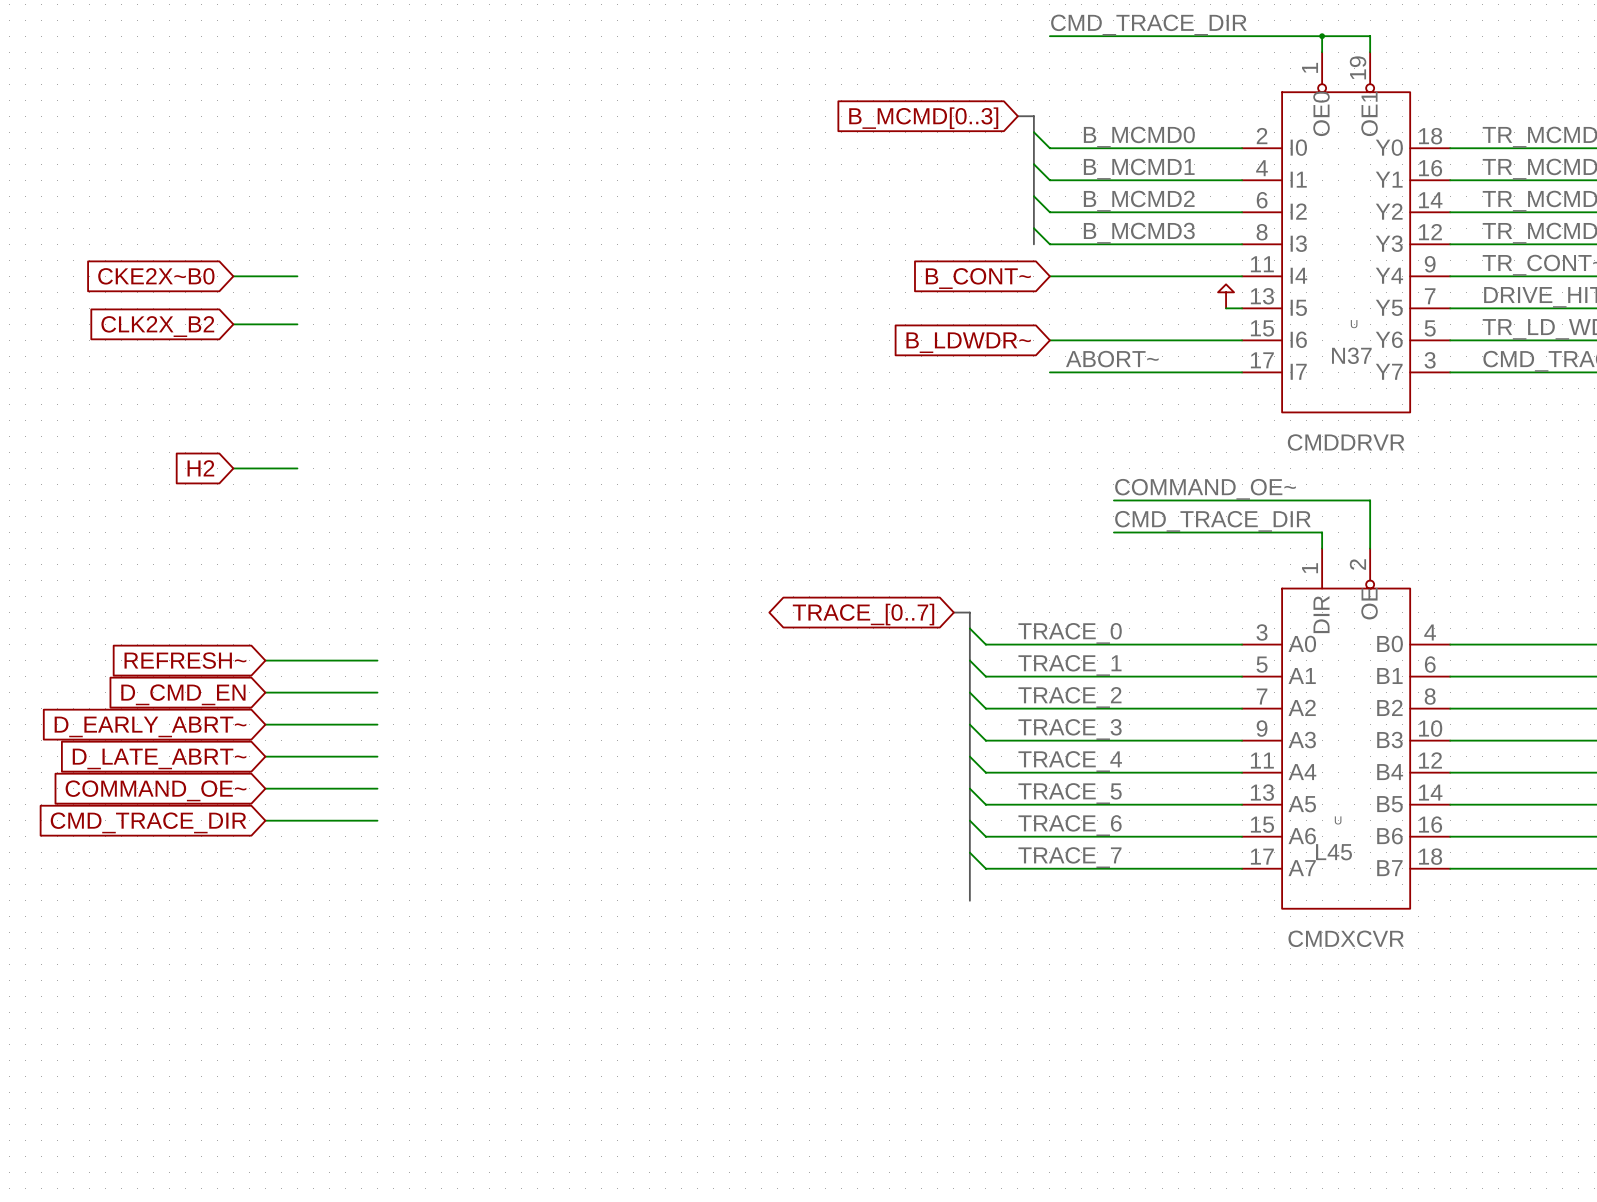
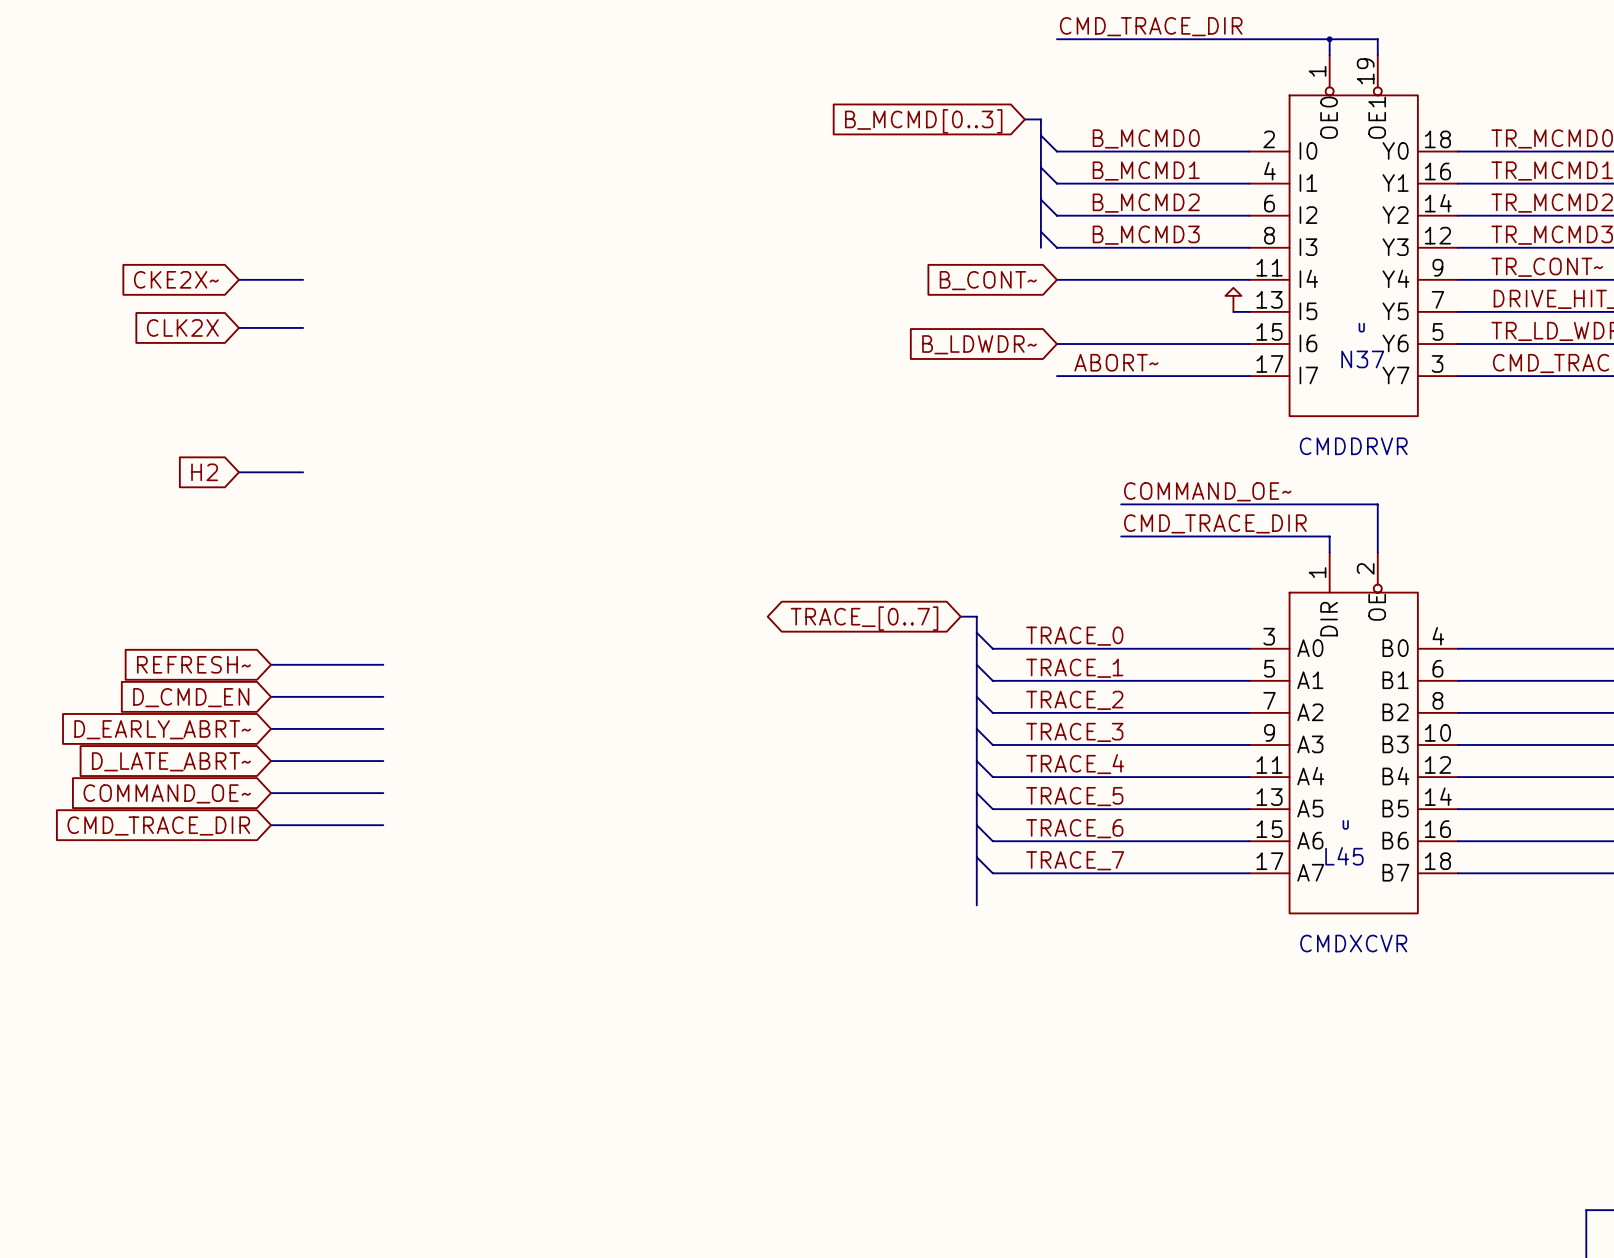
global label: CKE2X~B0 (156, 276) -> CKE2X~ (176, 279)
global label: CLK2X_B2 (157, 326) -> CLK2X (182, 327)

